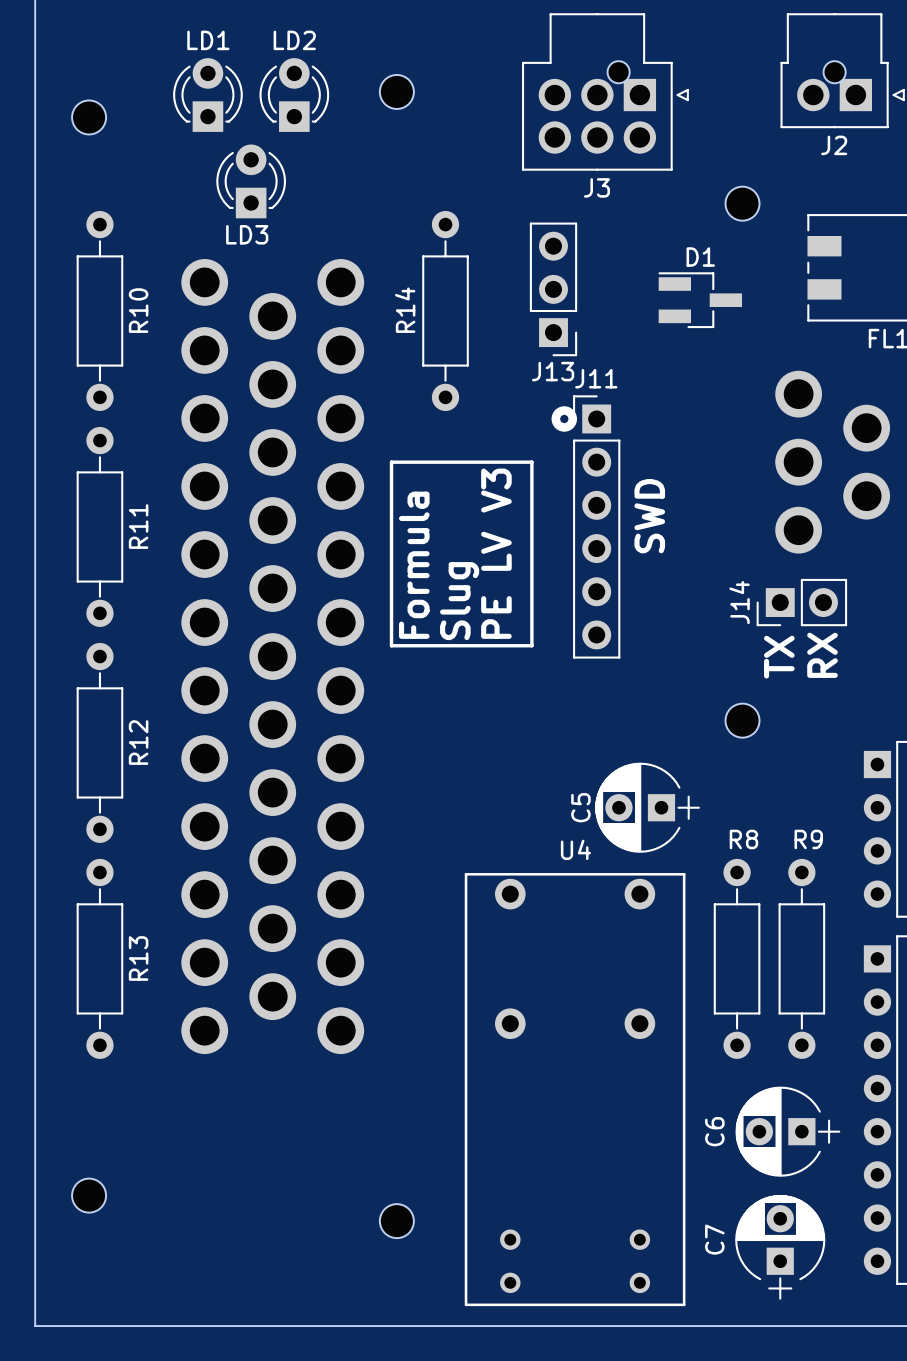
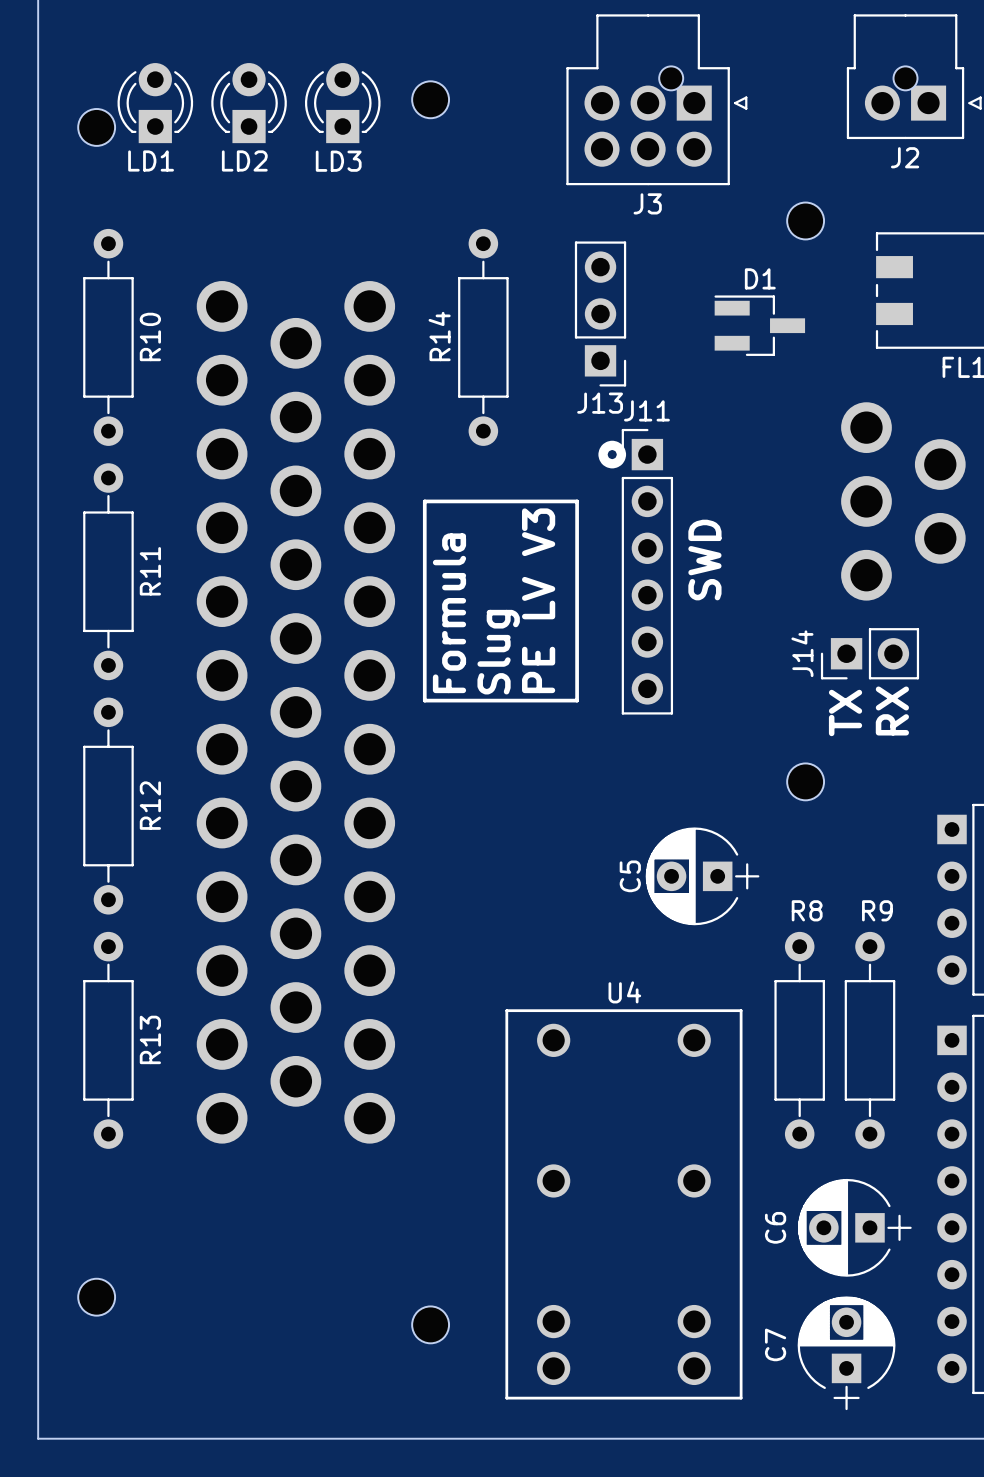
LD1 name position: LD1 (208, 40) -> LD1 (151, 160)
LD2 name position: LD2 (294, 40) -> LD2 (244, 160)
LD1 position: (207, 95) -> (155, 103)
LD2 position: (294, 95) -> (249, 103)
LD3 position: (251, 181) -> (342, 103)
U4 name position: U4 (575, 849) -> U4 (624, 992)
U4 footprint: [464, 873, 686, 1307] -> [505, 1009, 743, 1400]

